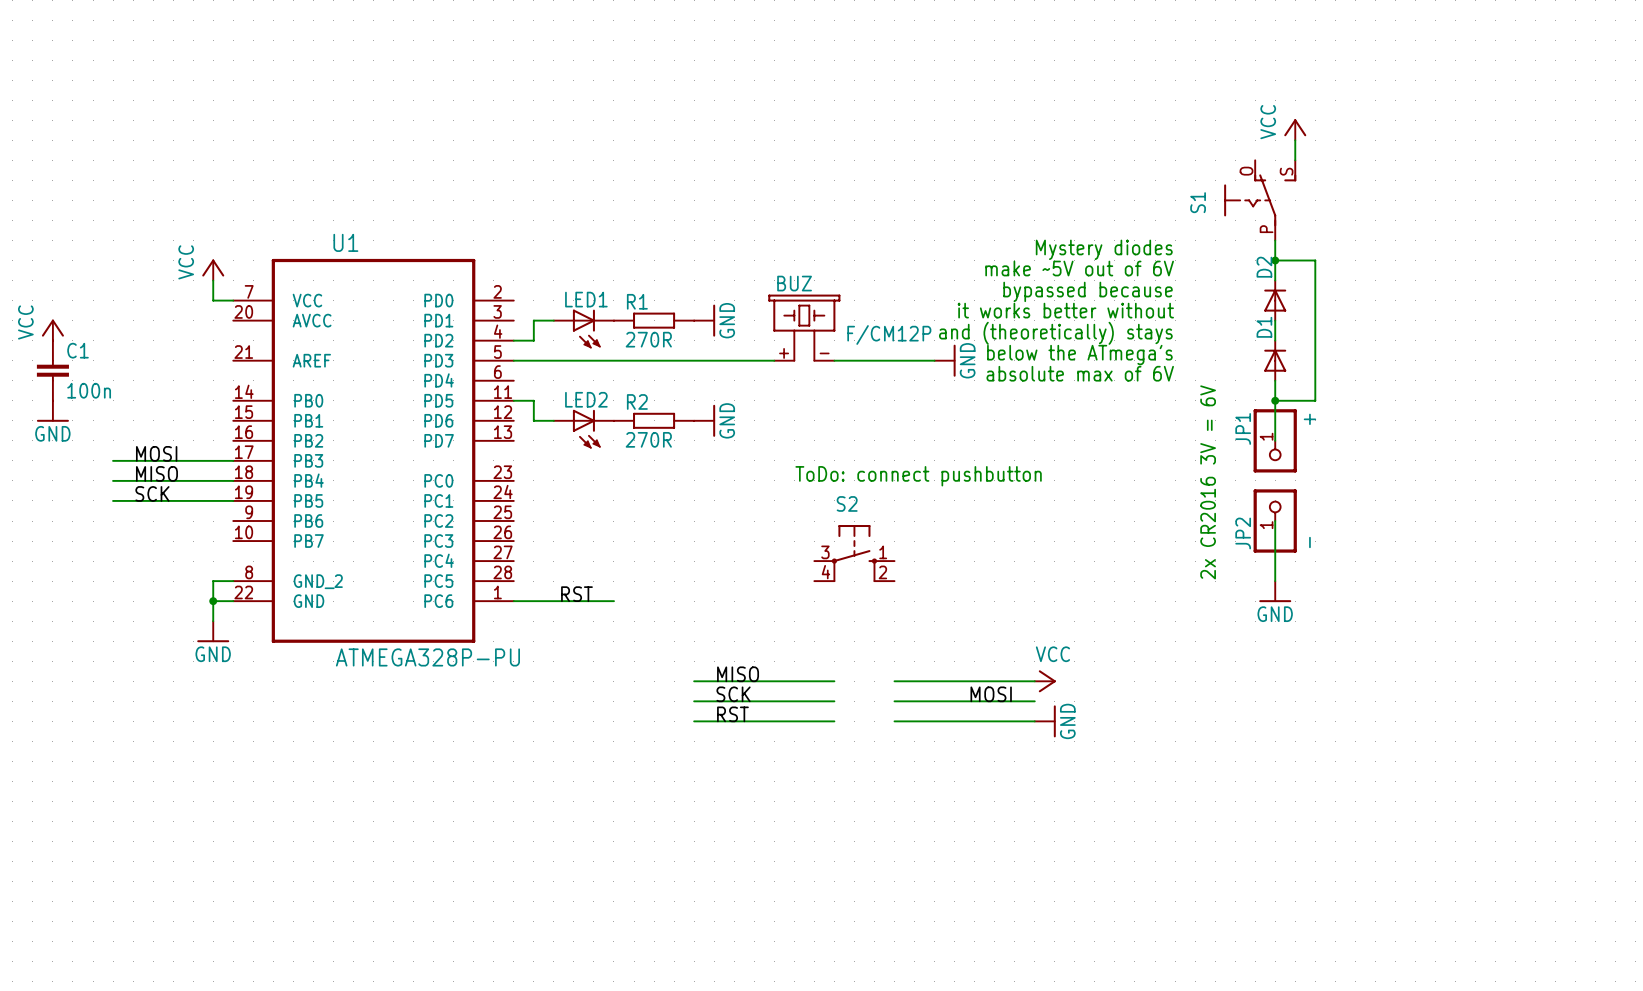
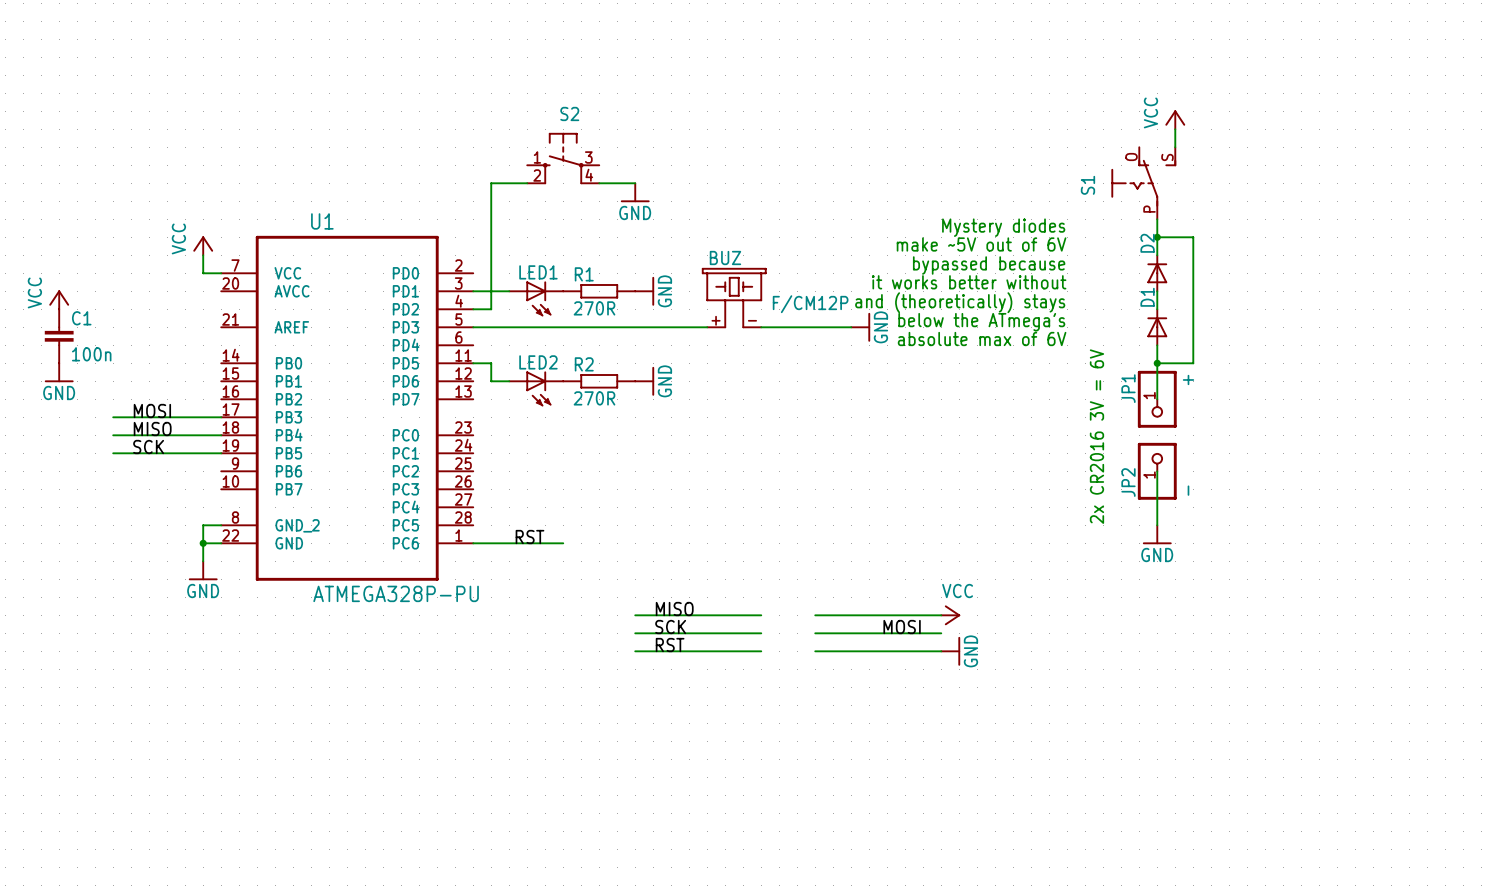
wire: none -> (527, 183) (491, 183) (491, 291) (473, 291)
wire: none -> (599, 183) (635, 183)
power symbol: none -> GND (635, 192)
text: ToDo: connect pushbutton (918, 476) -> none
S2 flip: as is (854, 553) -> left-right (563, 158)
S2 position: (854, 553) -> (563, 158)

